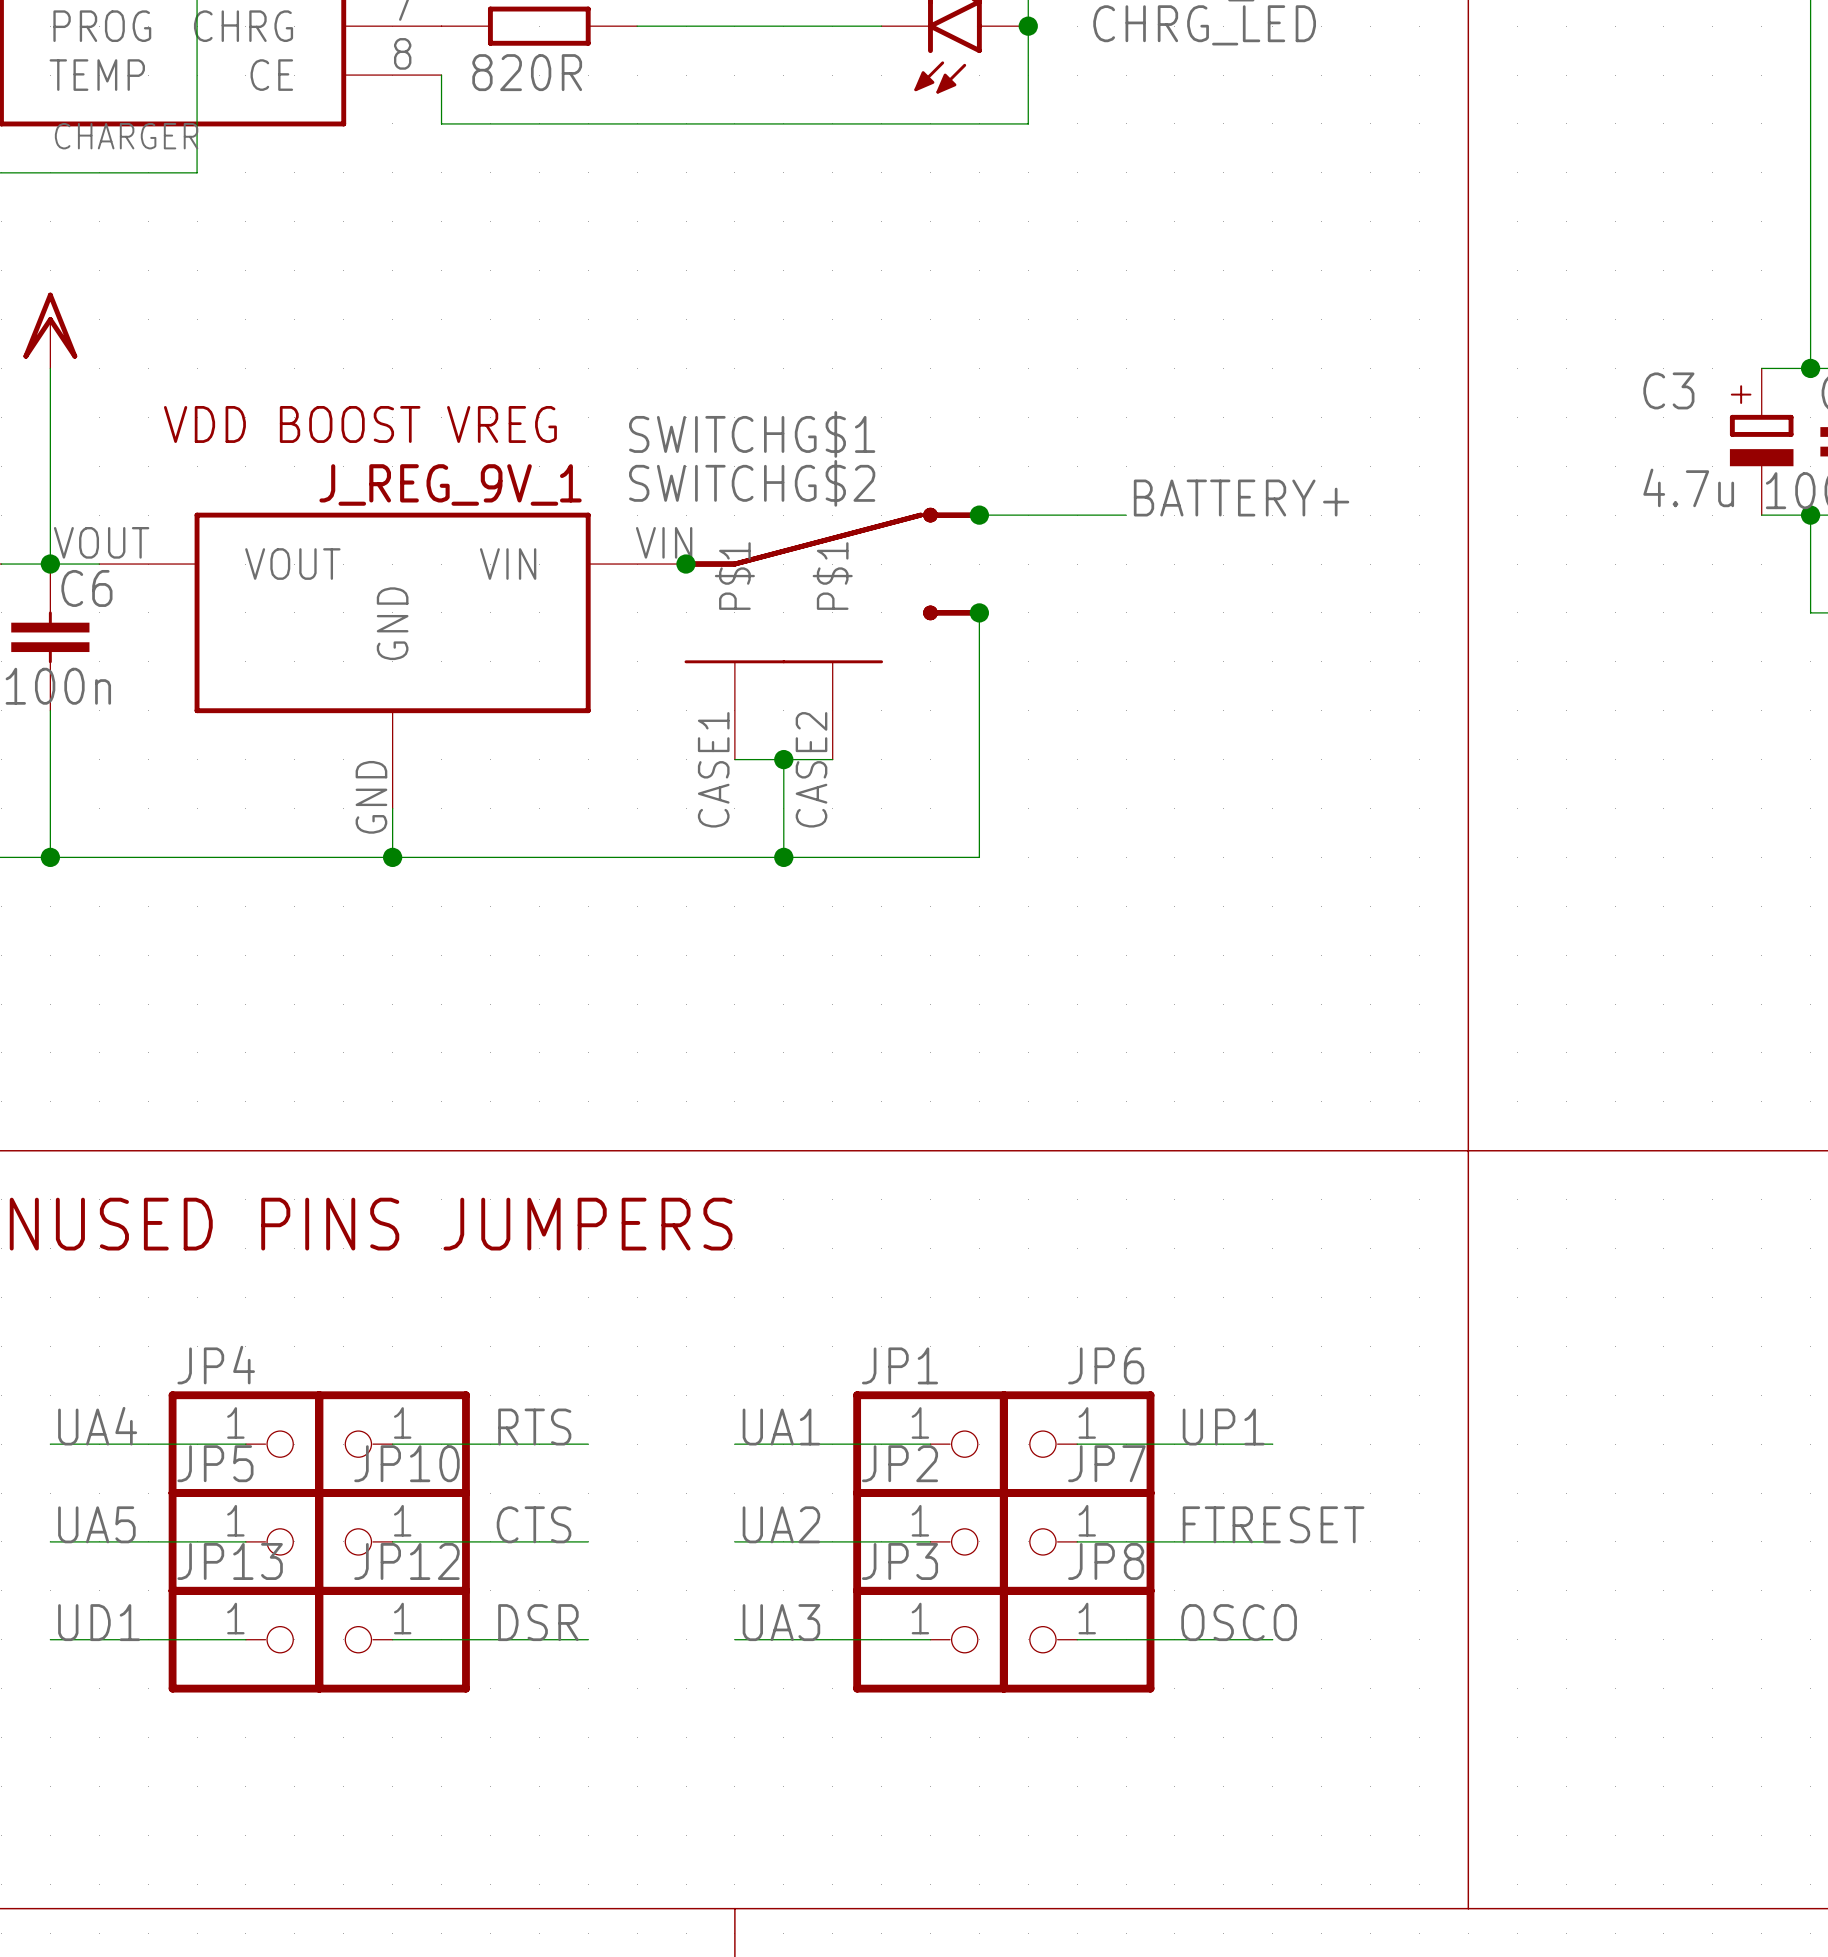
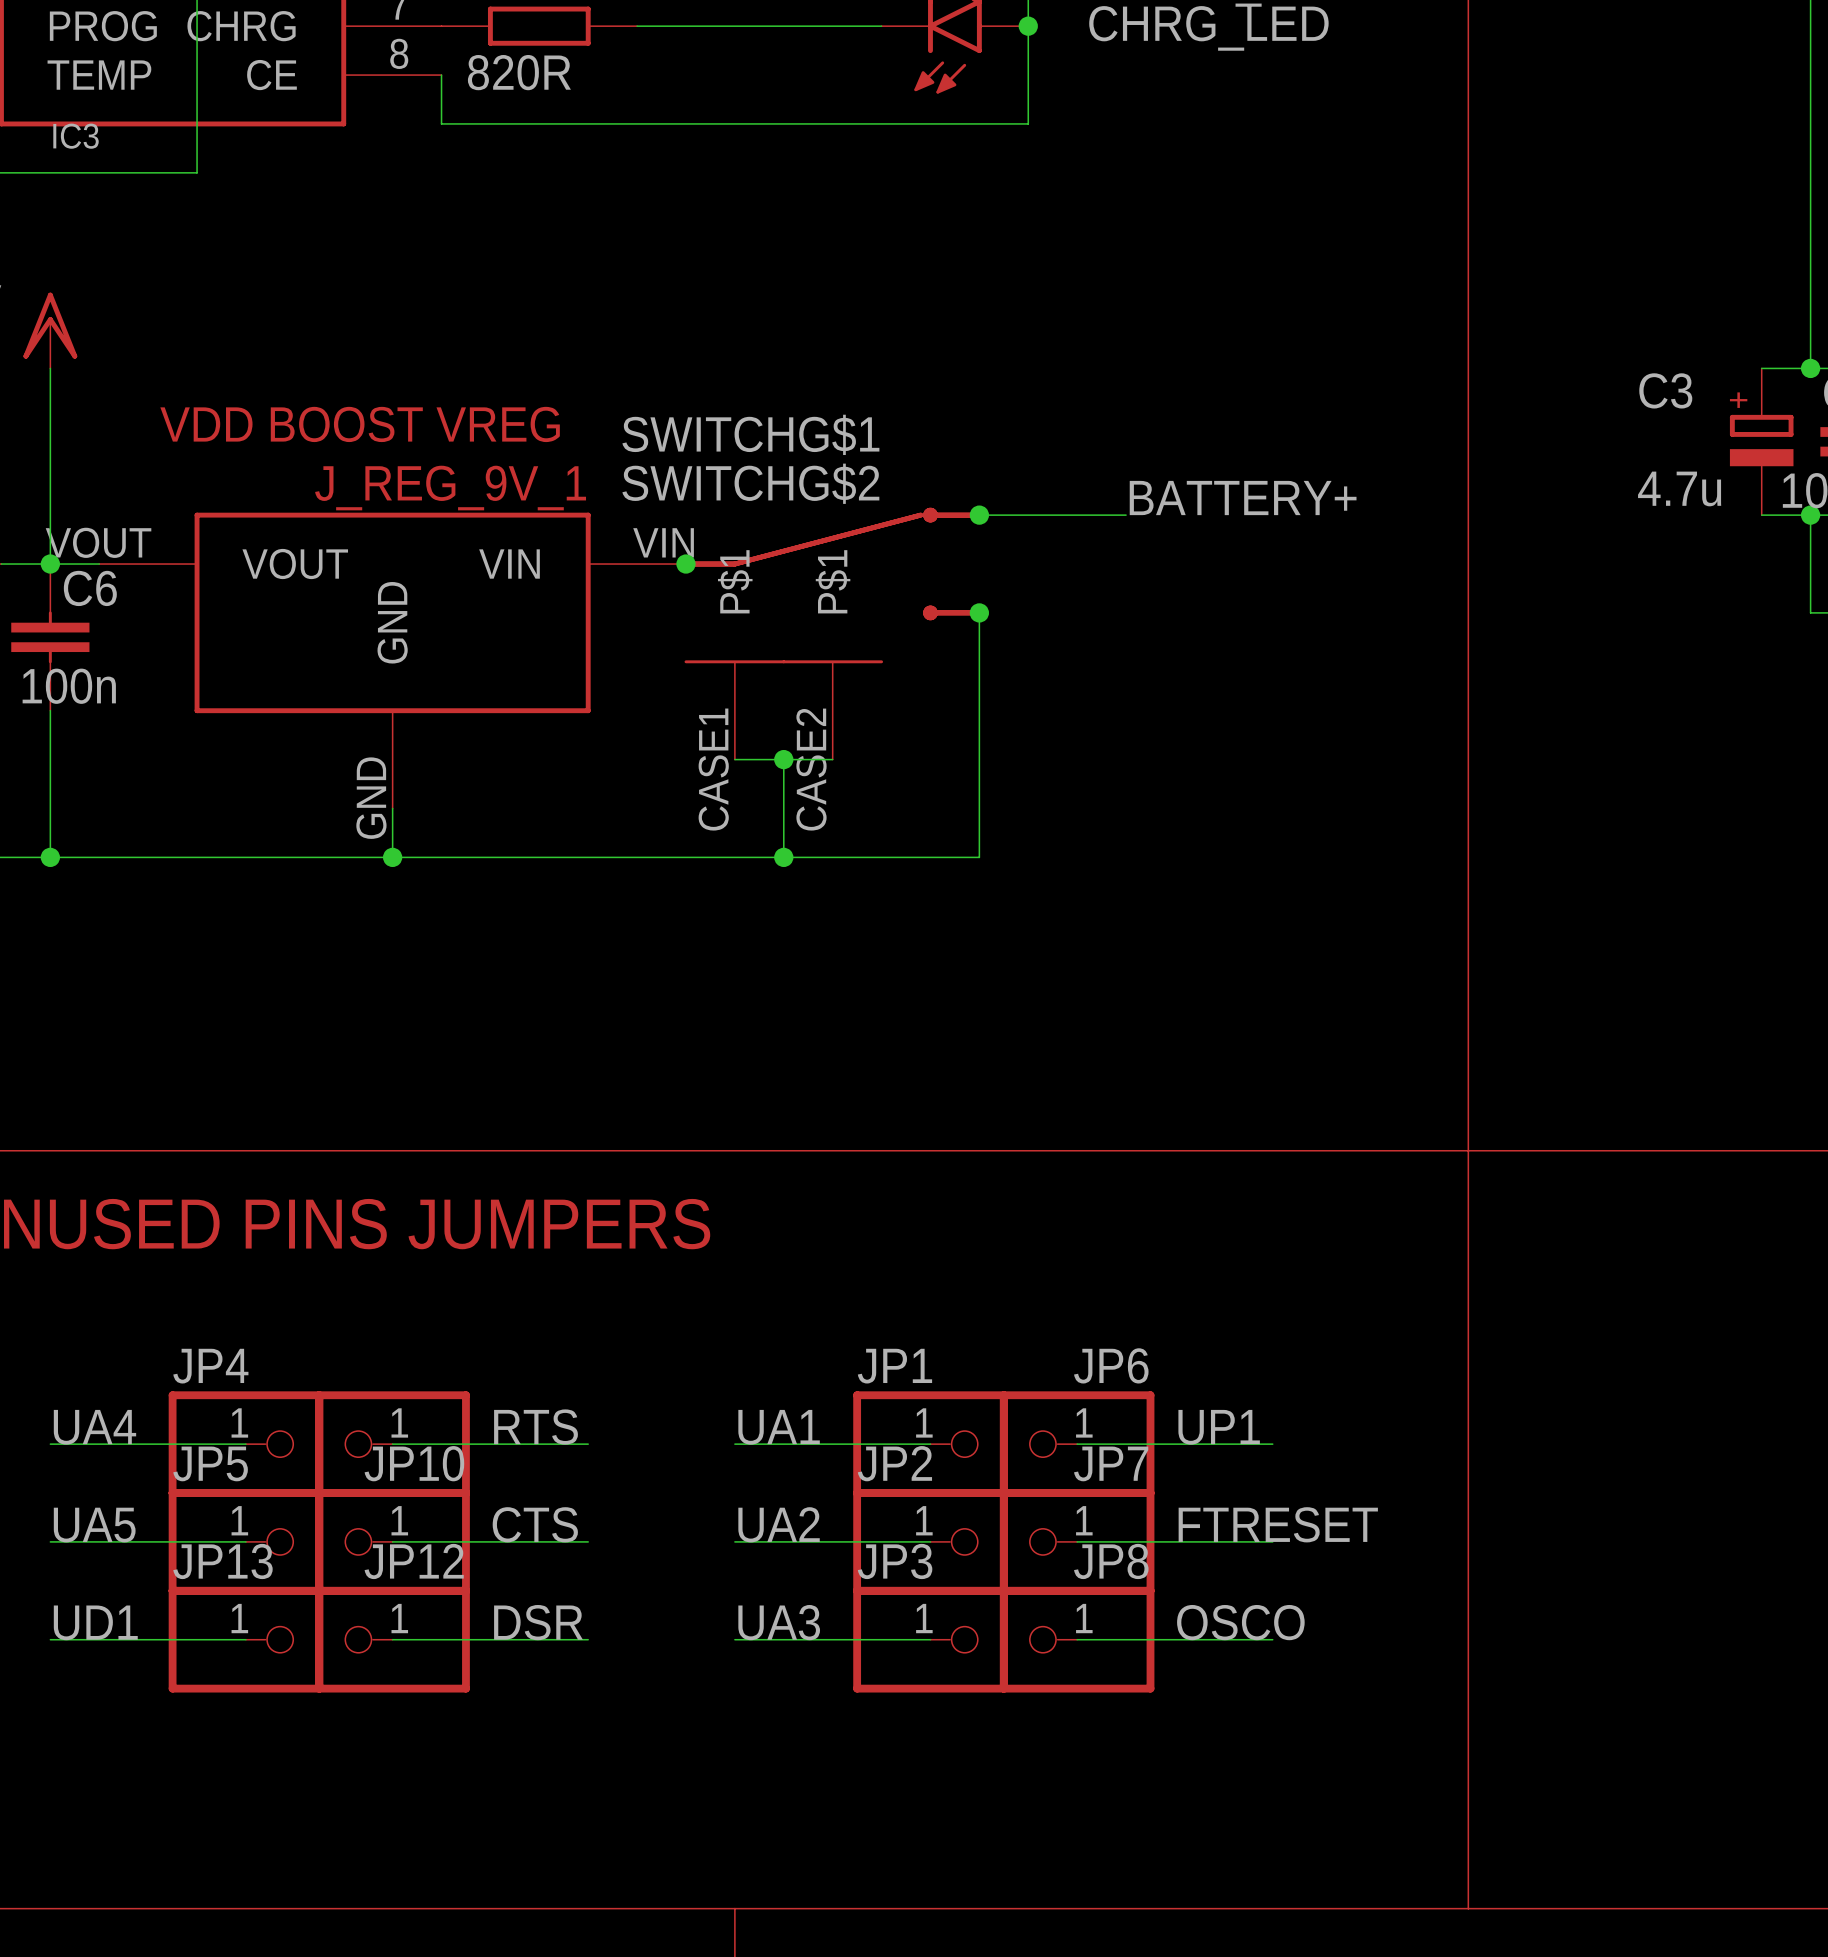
CHARGER name: CHARGER (126, 136) -> IC3 (76, 136)

